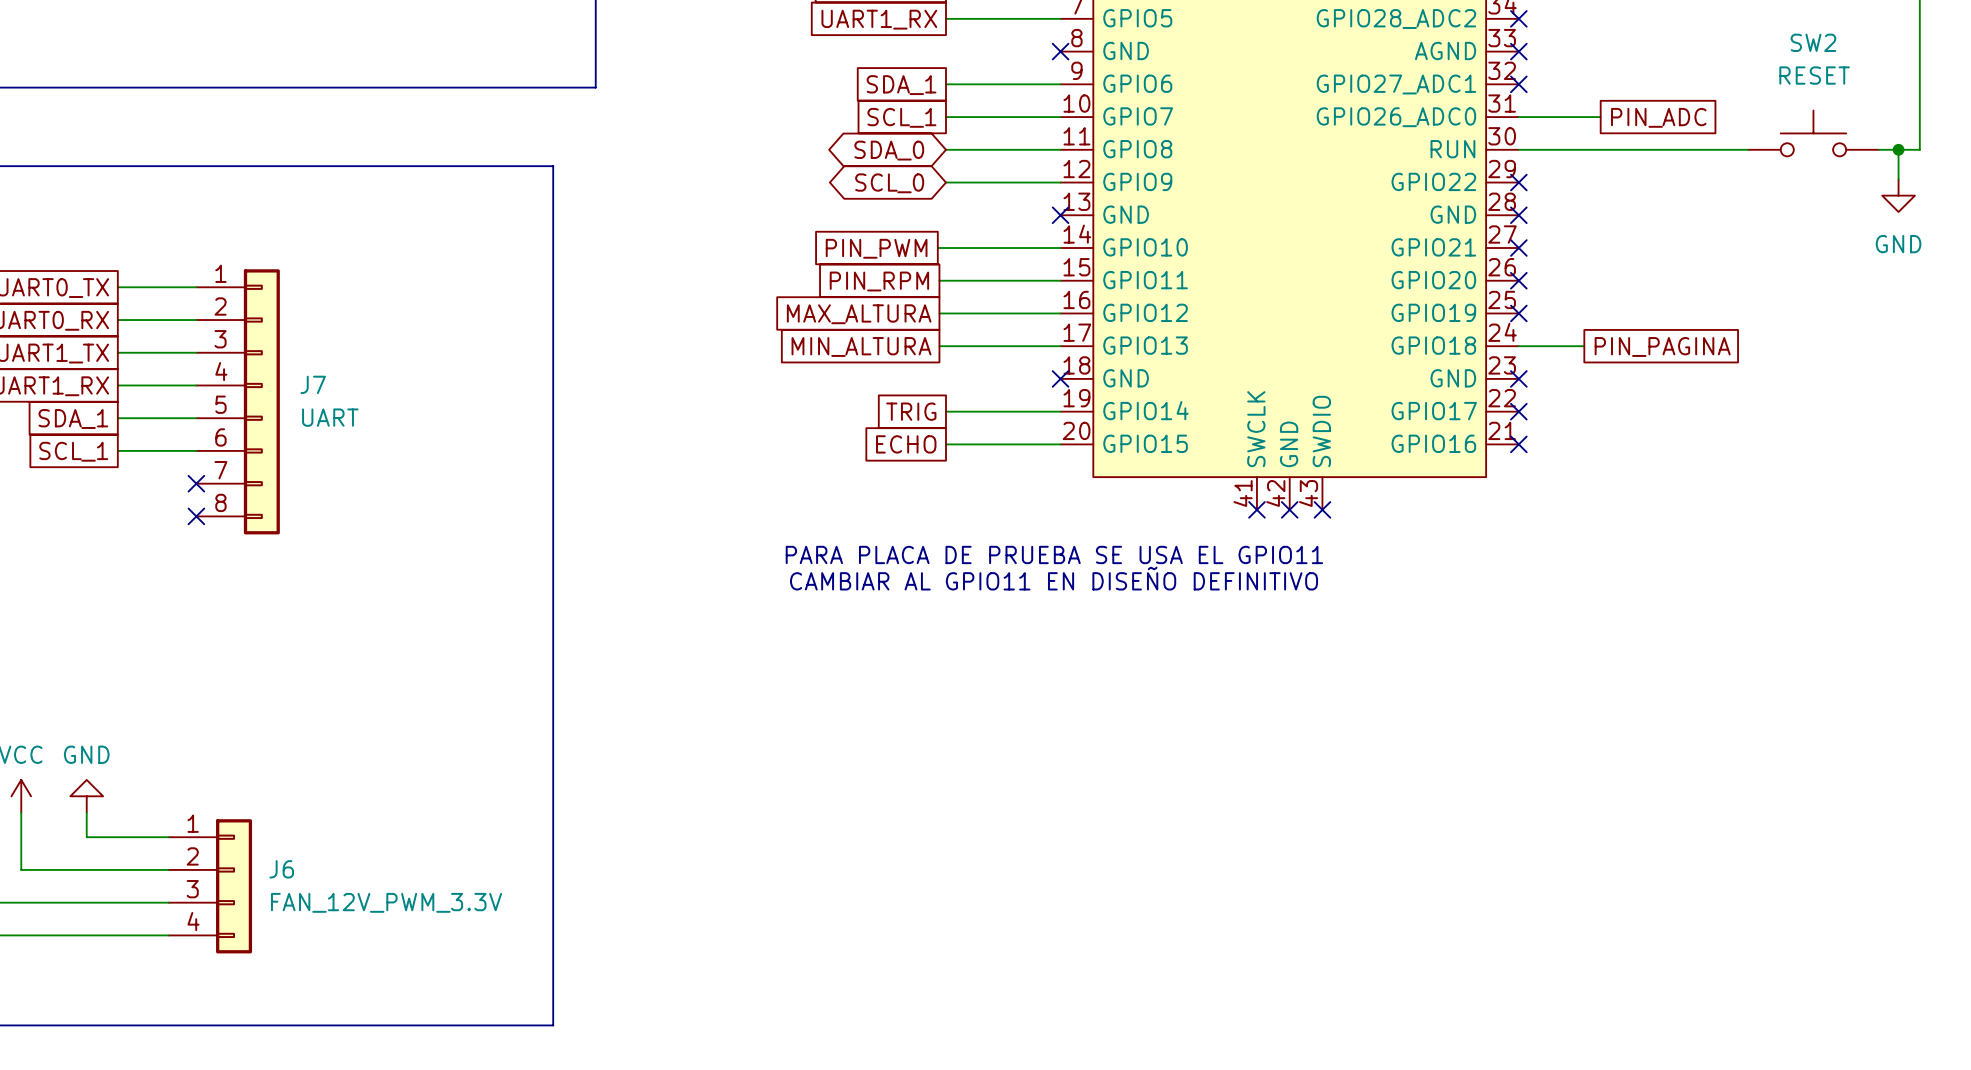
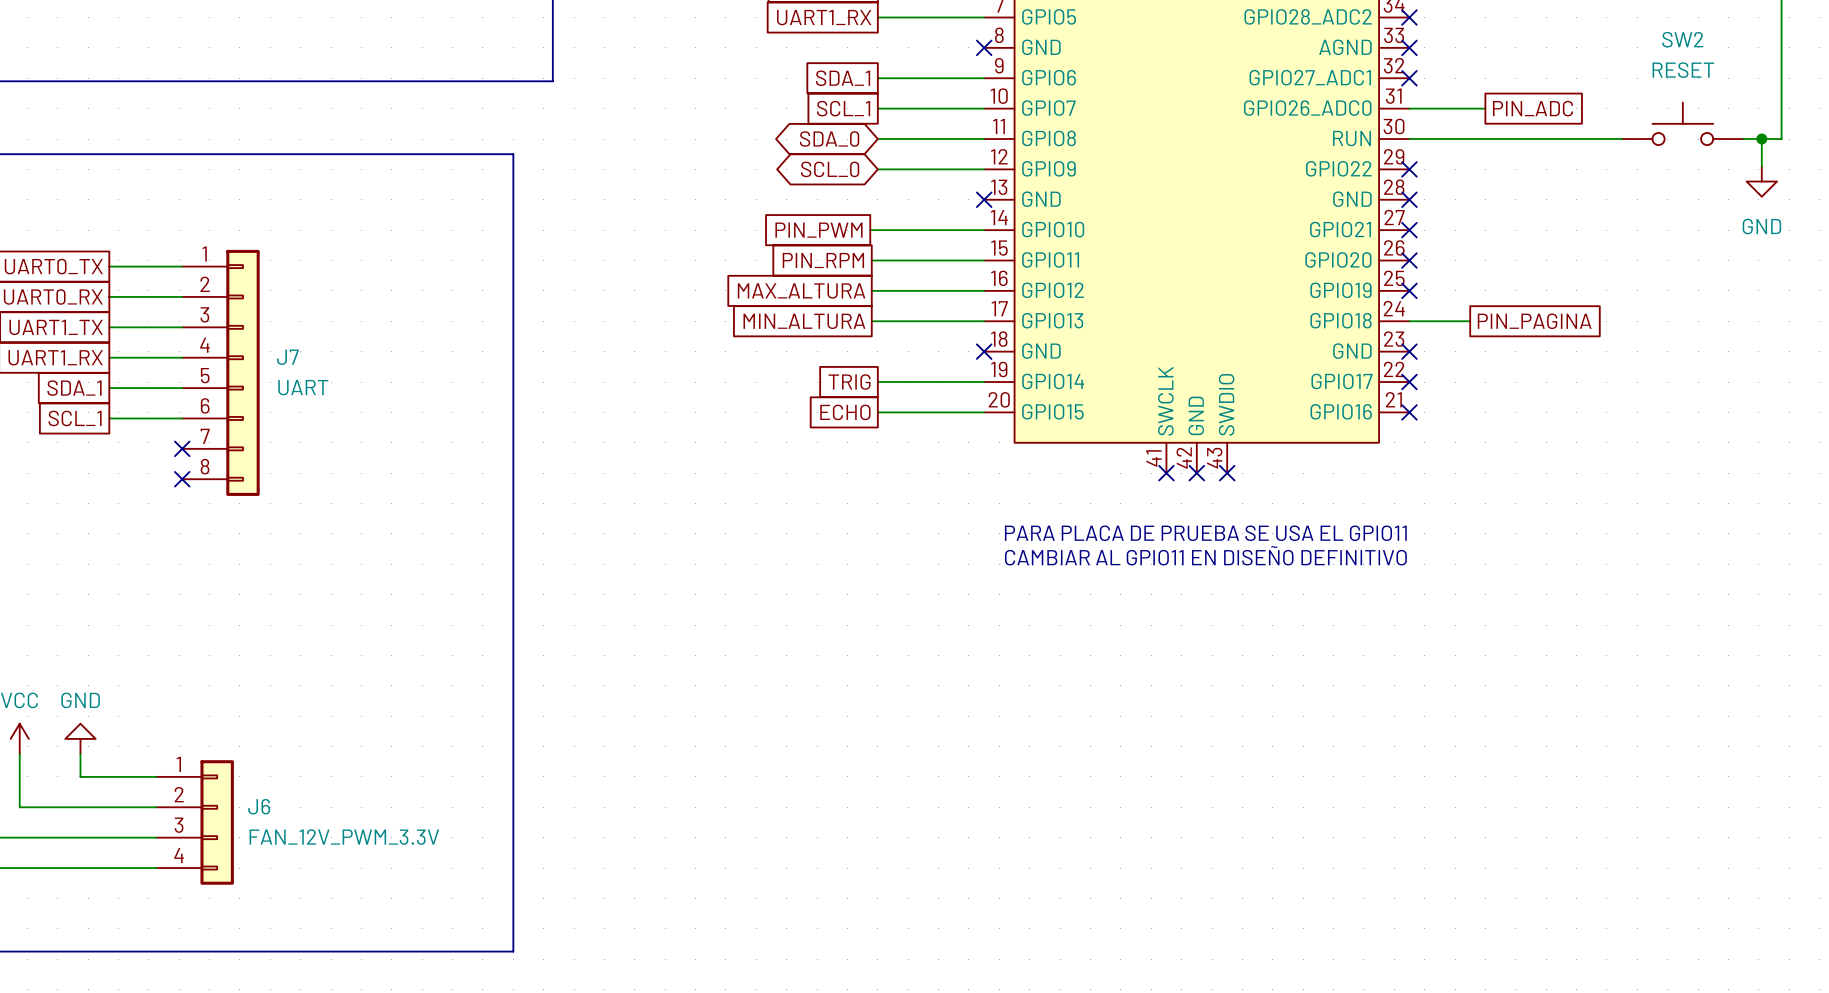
text position: PARA PLACA DE PRUEBA SE USA EL GPIO11 (1054, 554) -> PARA PLACA DE PRUEBA SE USA EL GPIO11 (1205, 533)
text position: CAMBIAR AL GPIO11 EN DISEÑO DEFINITIVO (1054, 578) -> CAMBIAR AL GPIO11 EN DISEÑO DEFINITIVO (1205, 555)

